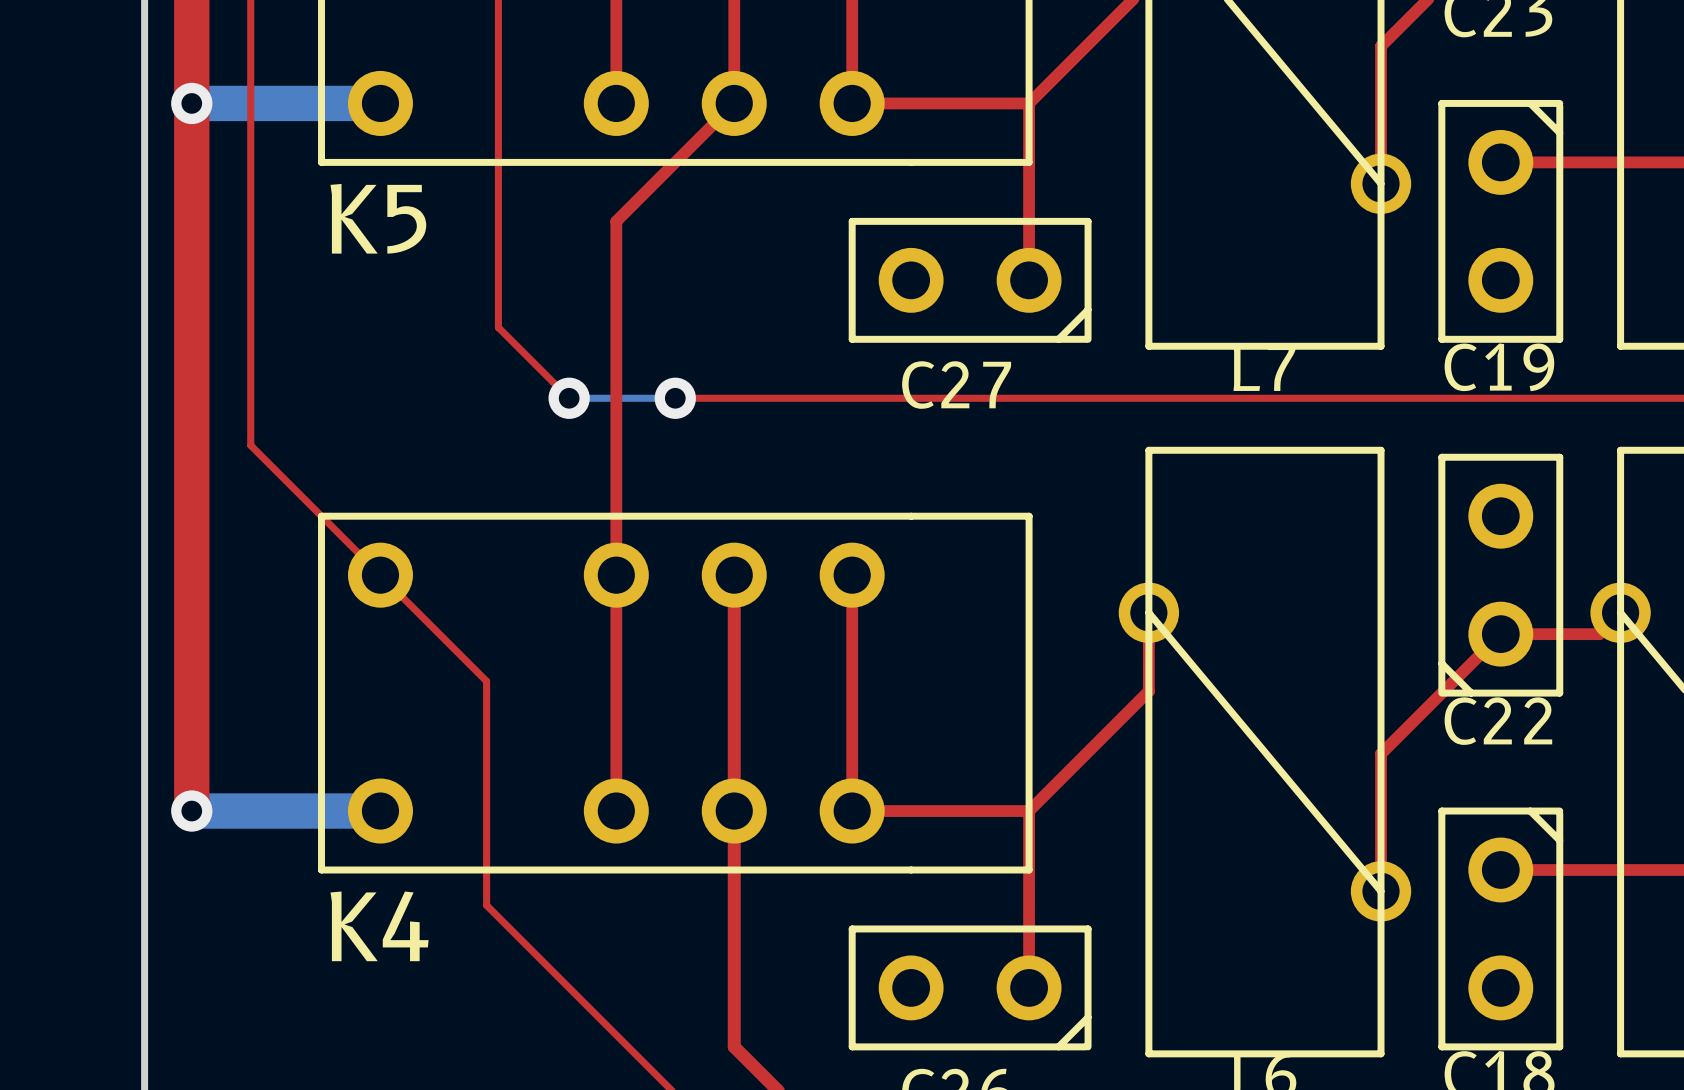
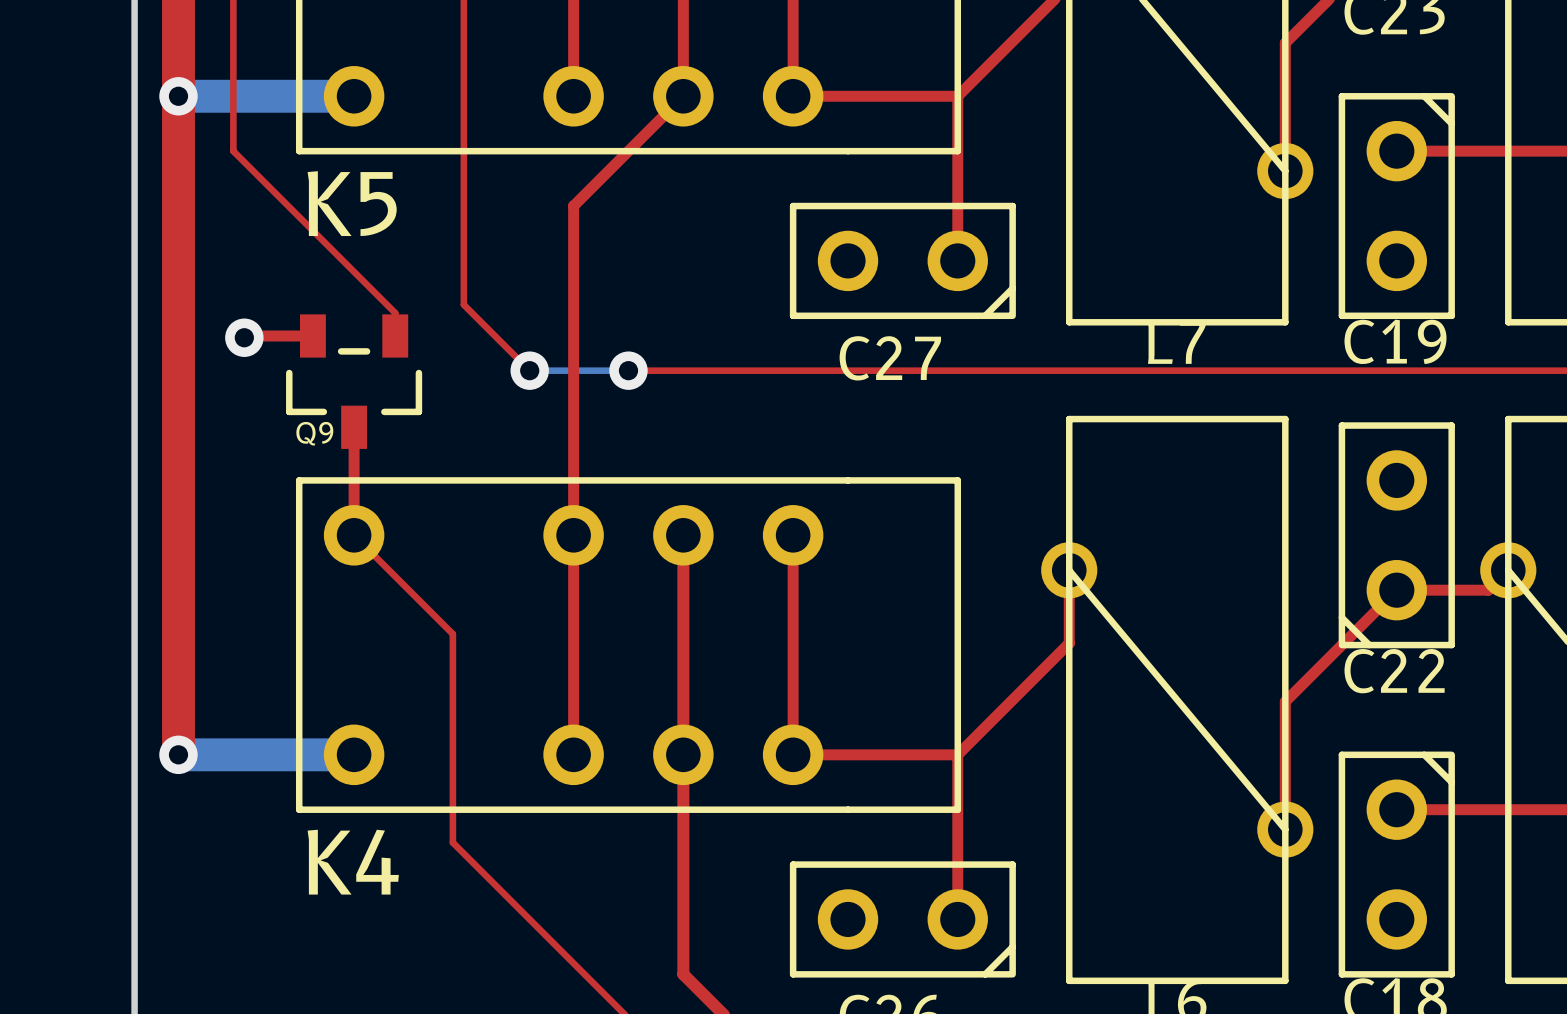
top track: (250, 162) (250, 445) (380, 575) -> (233, 151) (395, 313) (395, 335)
top track: none -> (312, 335) (246, 335) (244, 337)
via: none -> (244, 337)
Q9: none -> (354, 381)
top track: none -> (354, 427) (354, 535)

